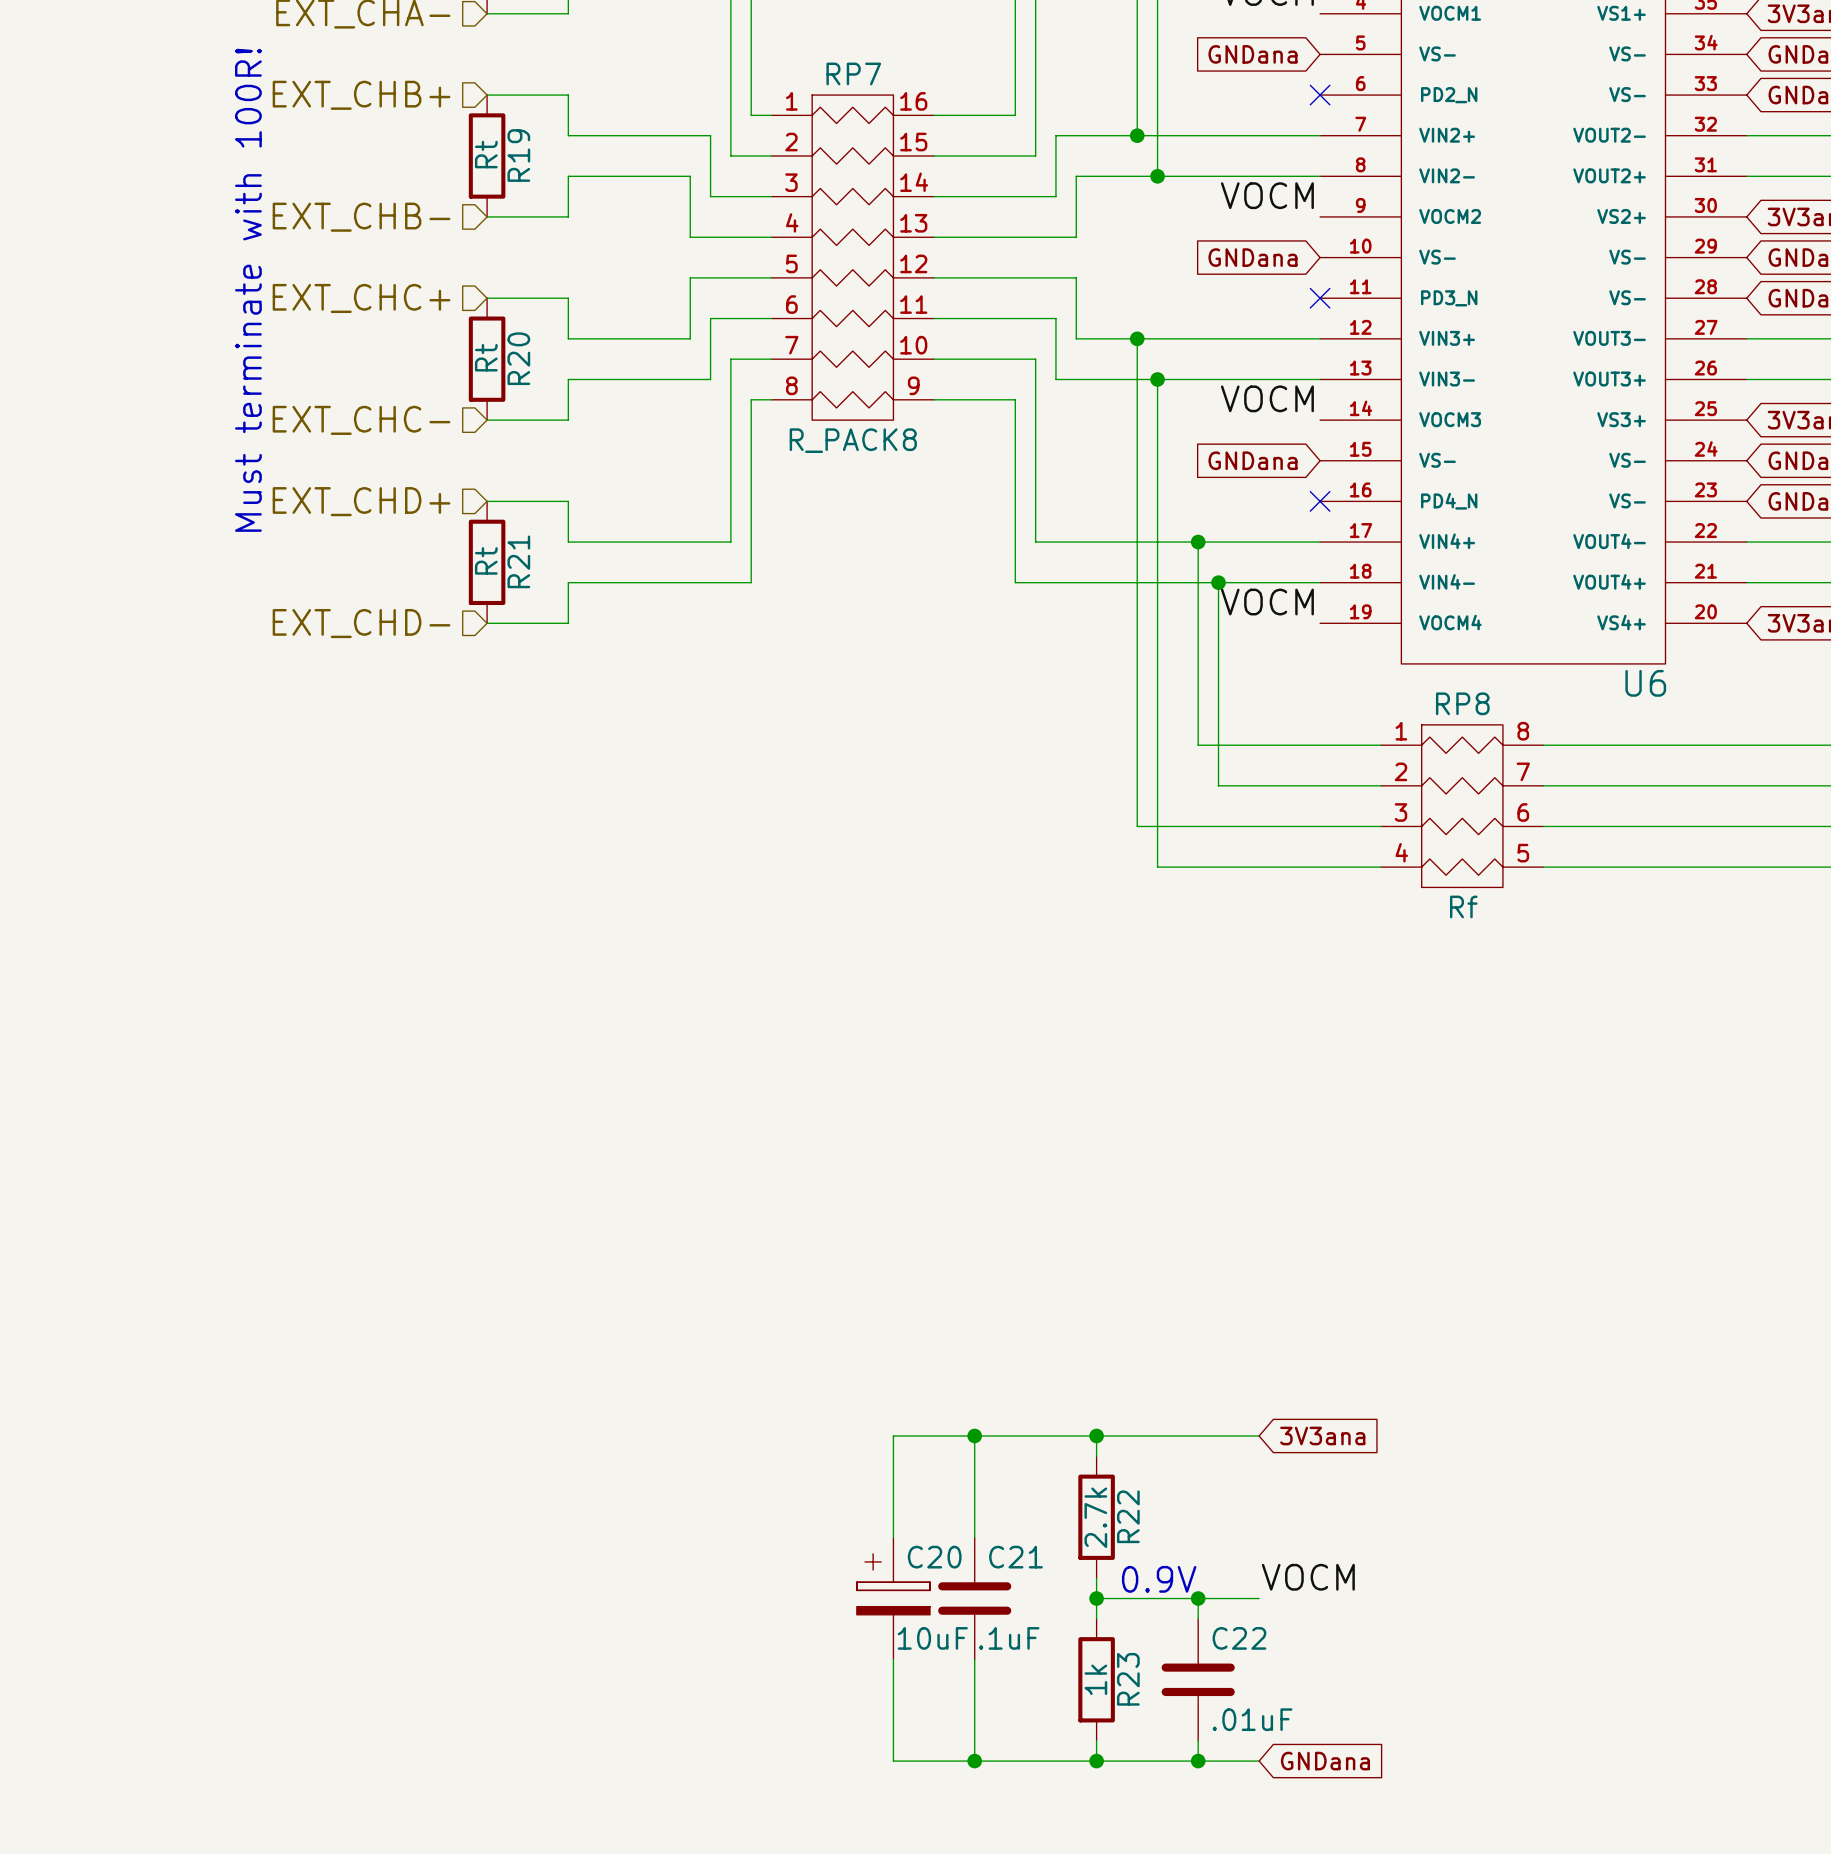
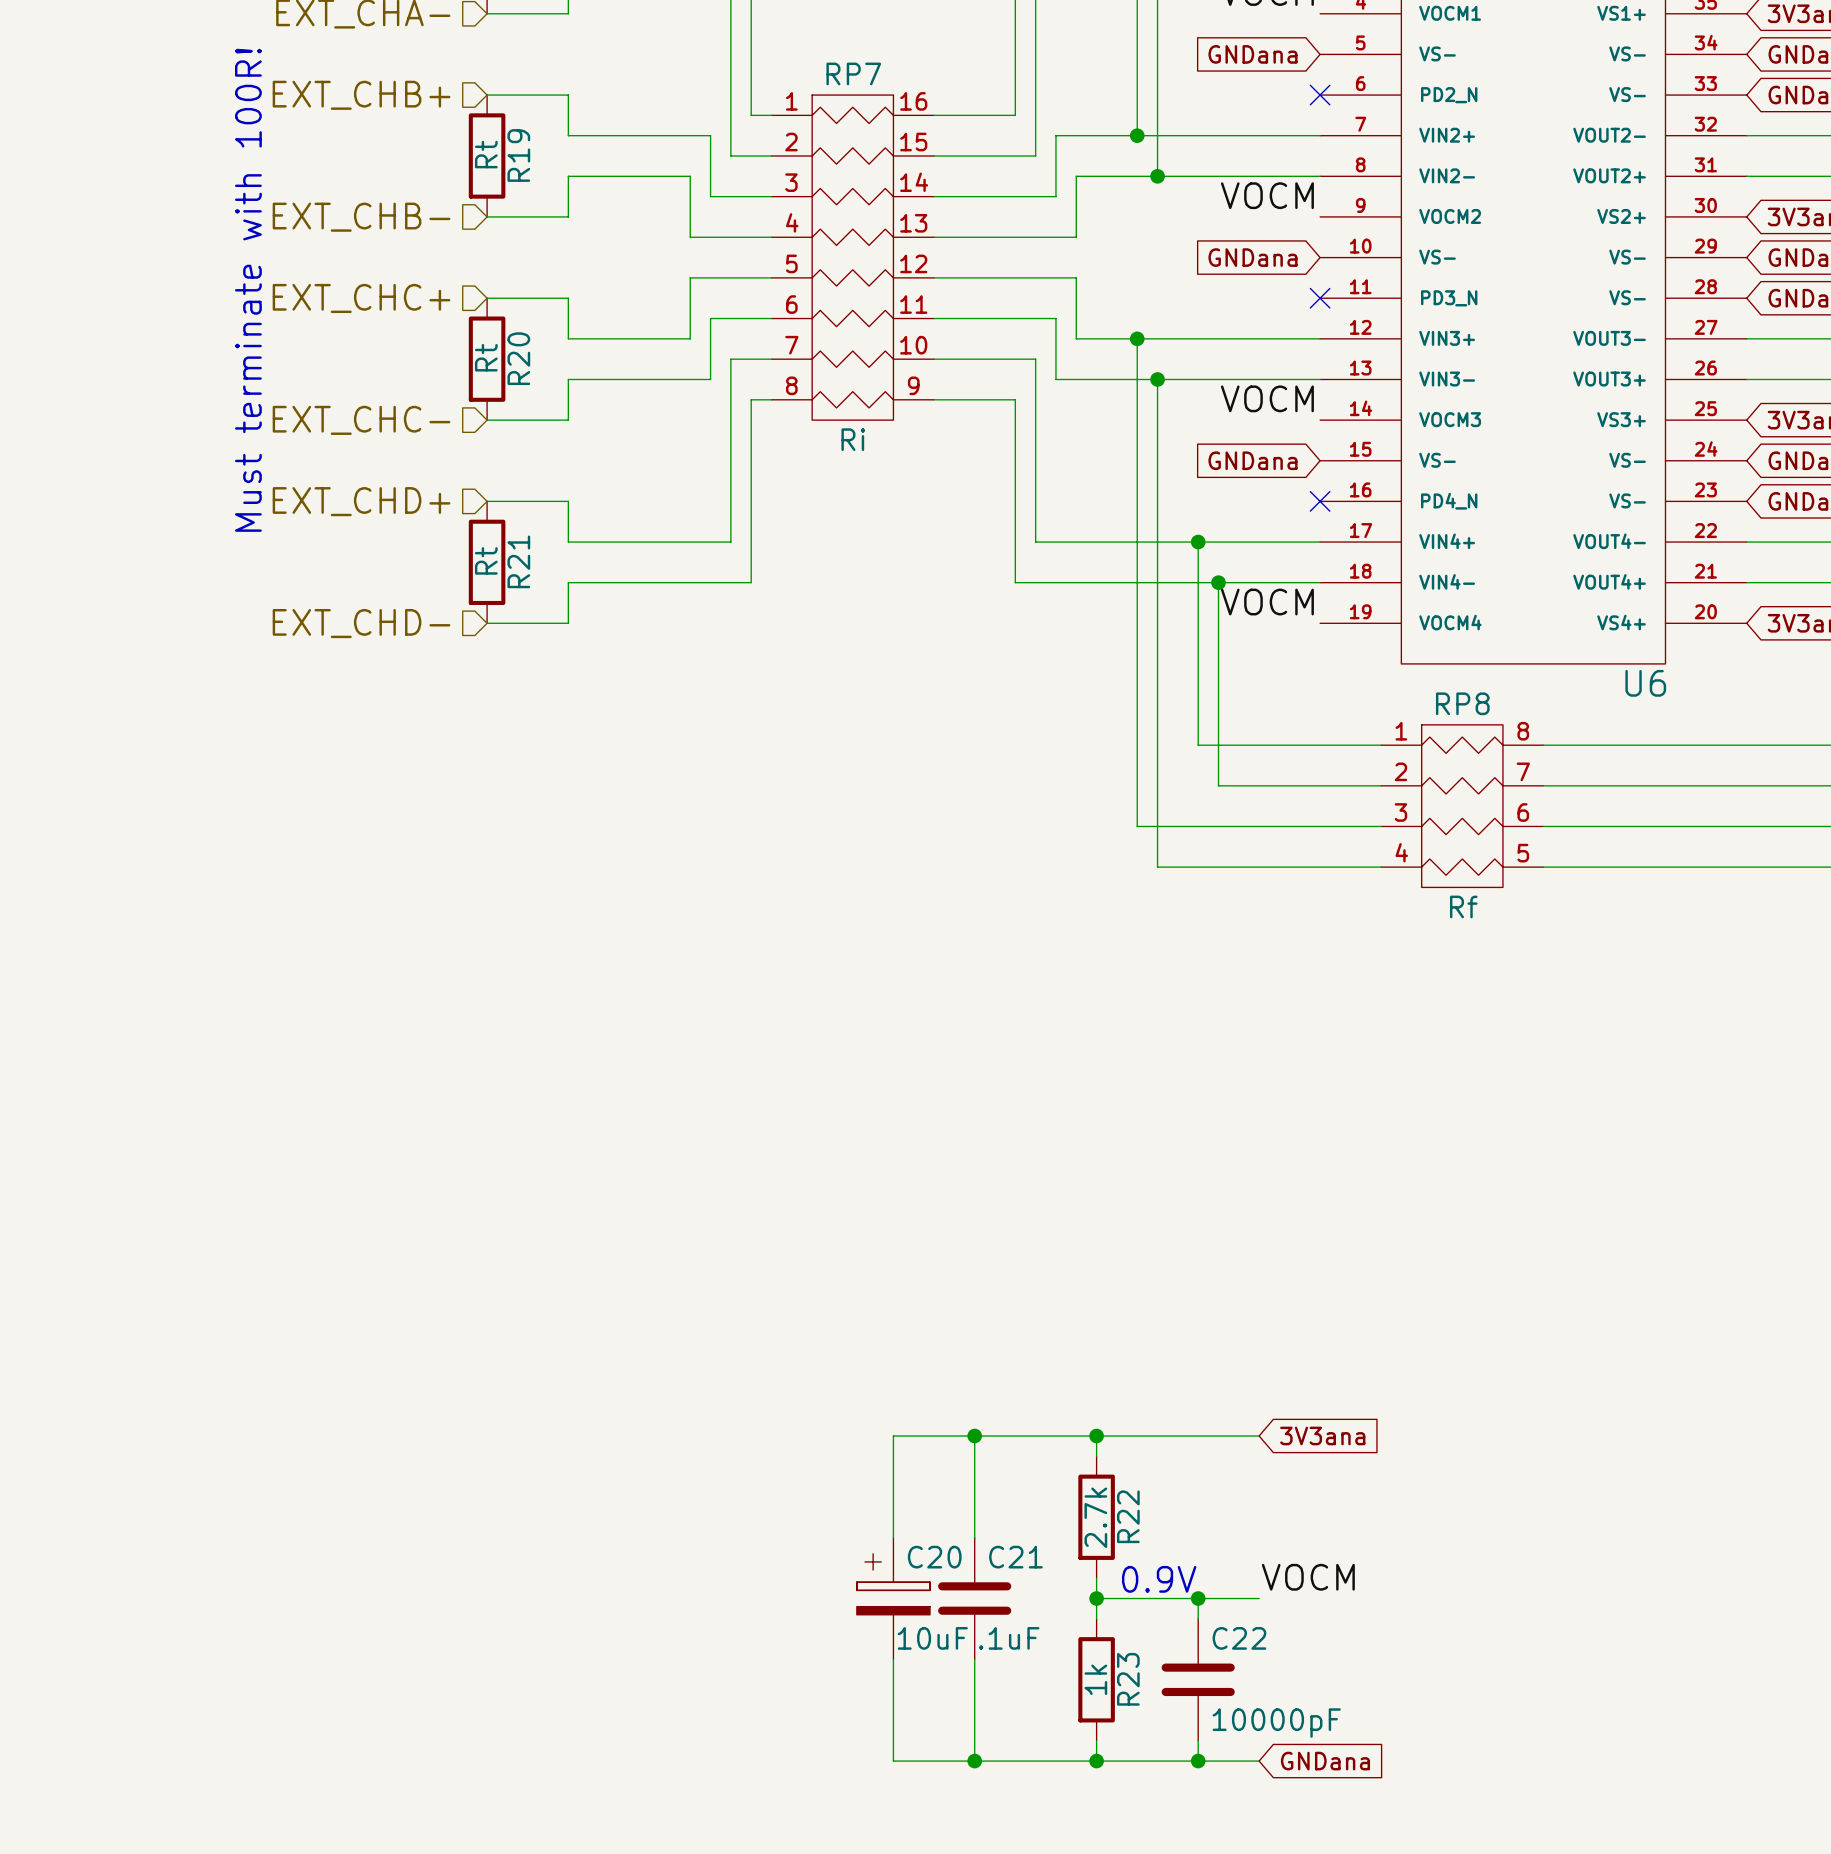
RP7 value: R_PACK8 (853, 440) -> Ri (853, 439)
C22 value: .01uF (1252, 1719) -> 10000pF (1276, 1723)

